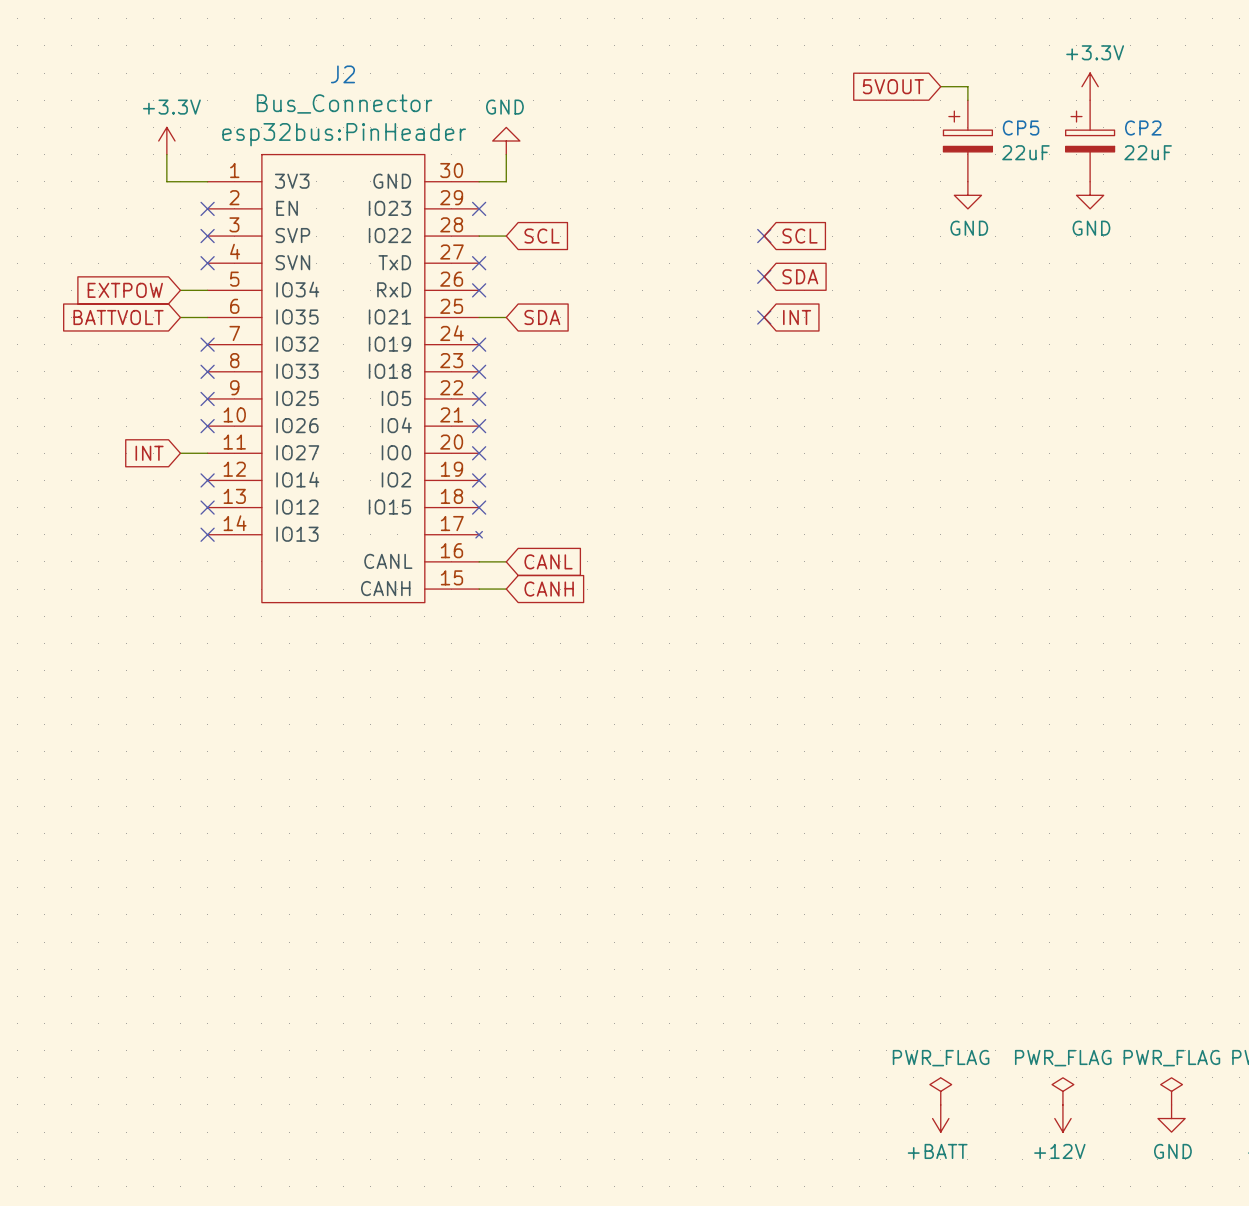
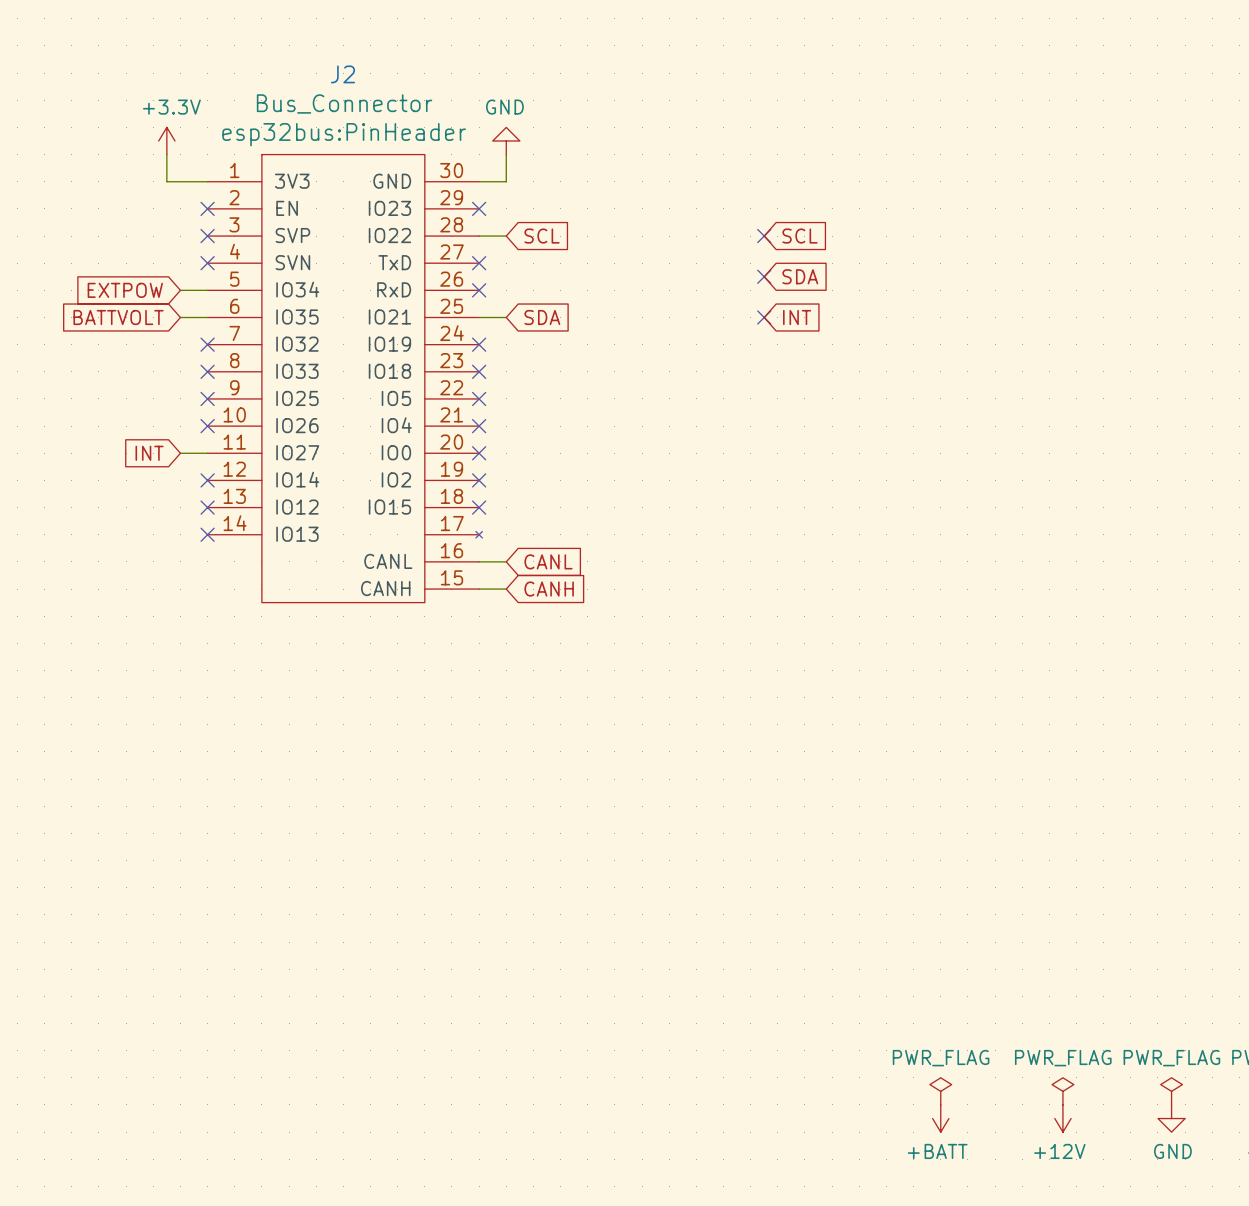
global label: 5VOUT (893, 86) -> none
wire: (940, 86) (967, 86) (967, 100) -> none
power symbol: +3.3V (1090, 86) -> none
CP5: 22uF (967, 141) -> none
CP2: 22uF (1090, 141) -> none
power symbol: GND (967, 195) -> none
power symbol: GND (1090, 195) -> none

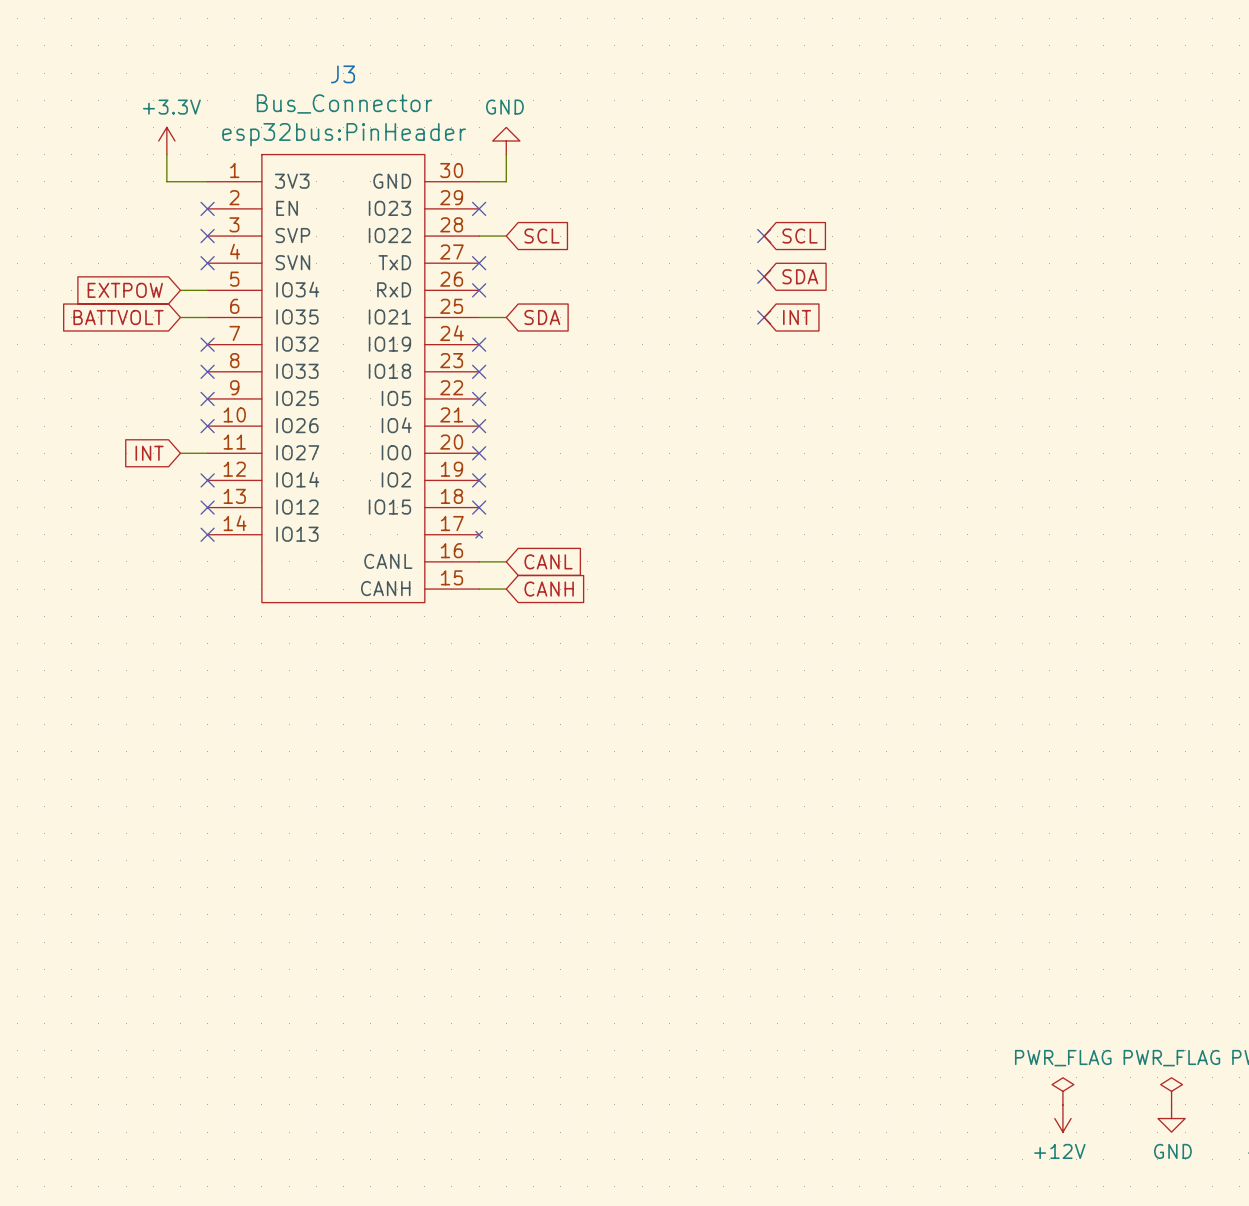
J2 name: J2 (342, 74) -> J3 (342, 74)
power symbol: PWR_FLAG (940, 1091) -> none
power symbol: +BATT (940, 1118) -> none

